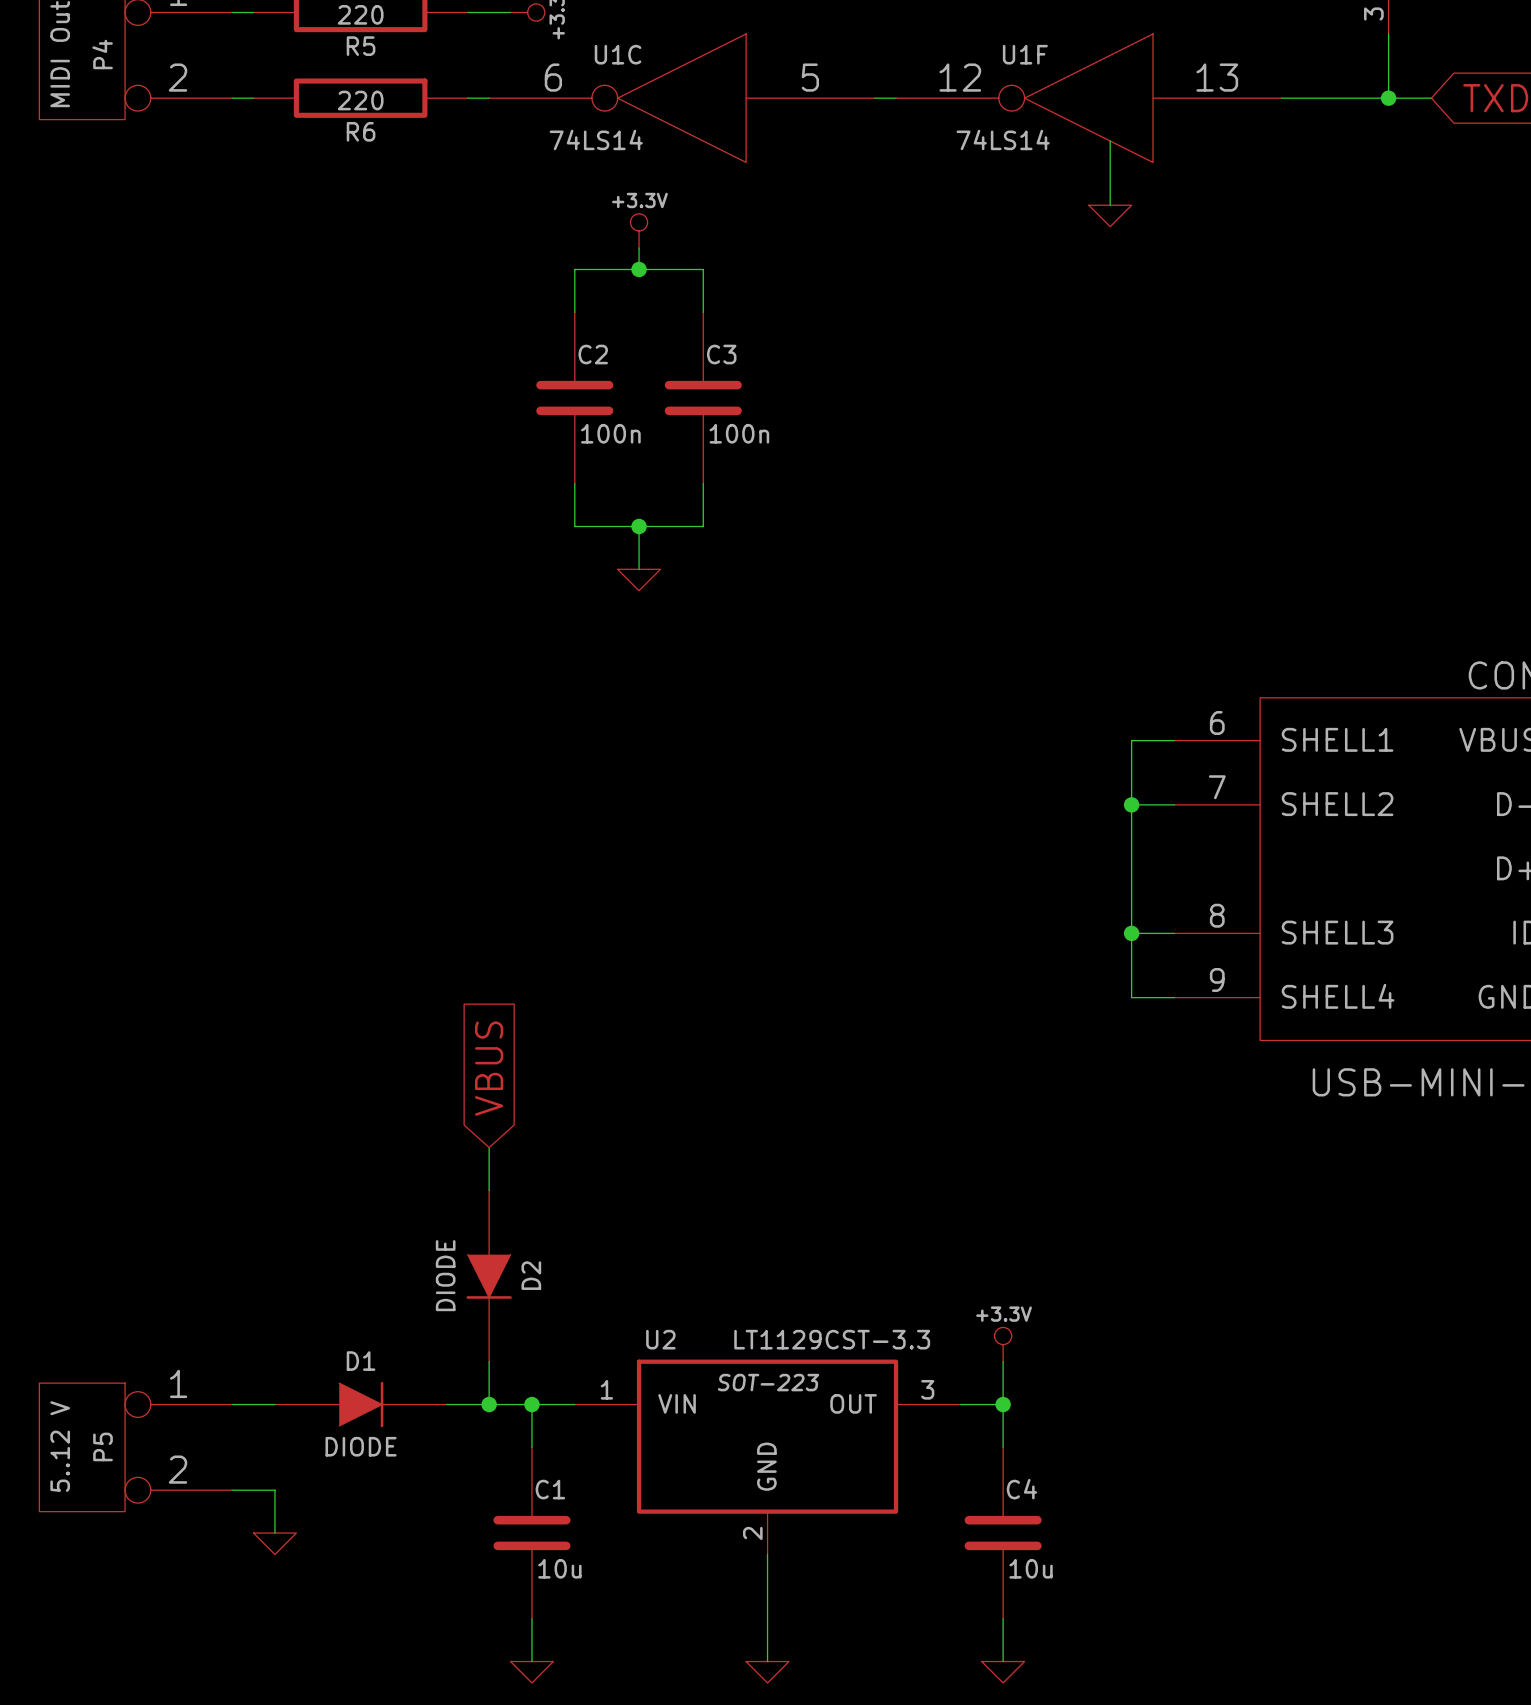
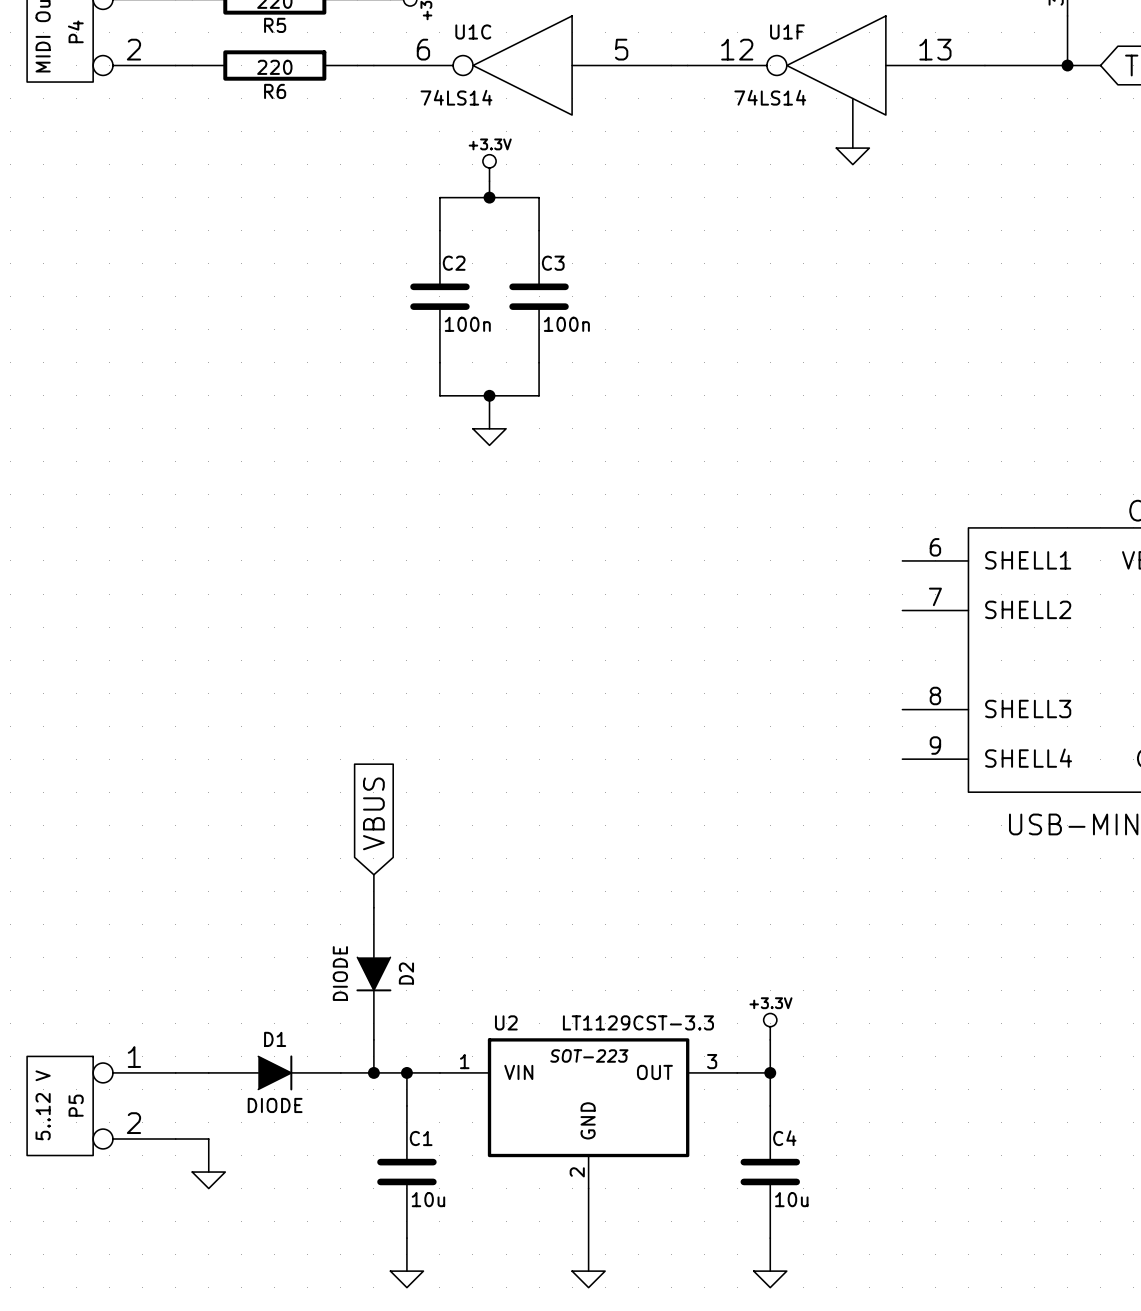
wire: (1174, 740) (1131, 740) (1131, 997) (1174, 997) -> none
wire: (1131, 804) (1174, 804) -> none
junction: (1131, 804) -> none
wire: (1131, 933) (1174, 933) -> none
junction: (1131, 933) -> none

